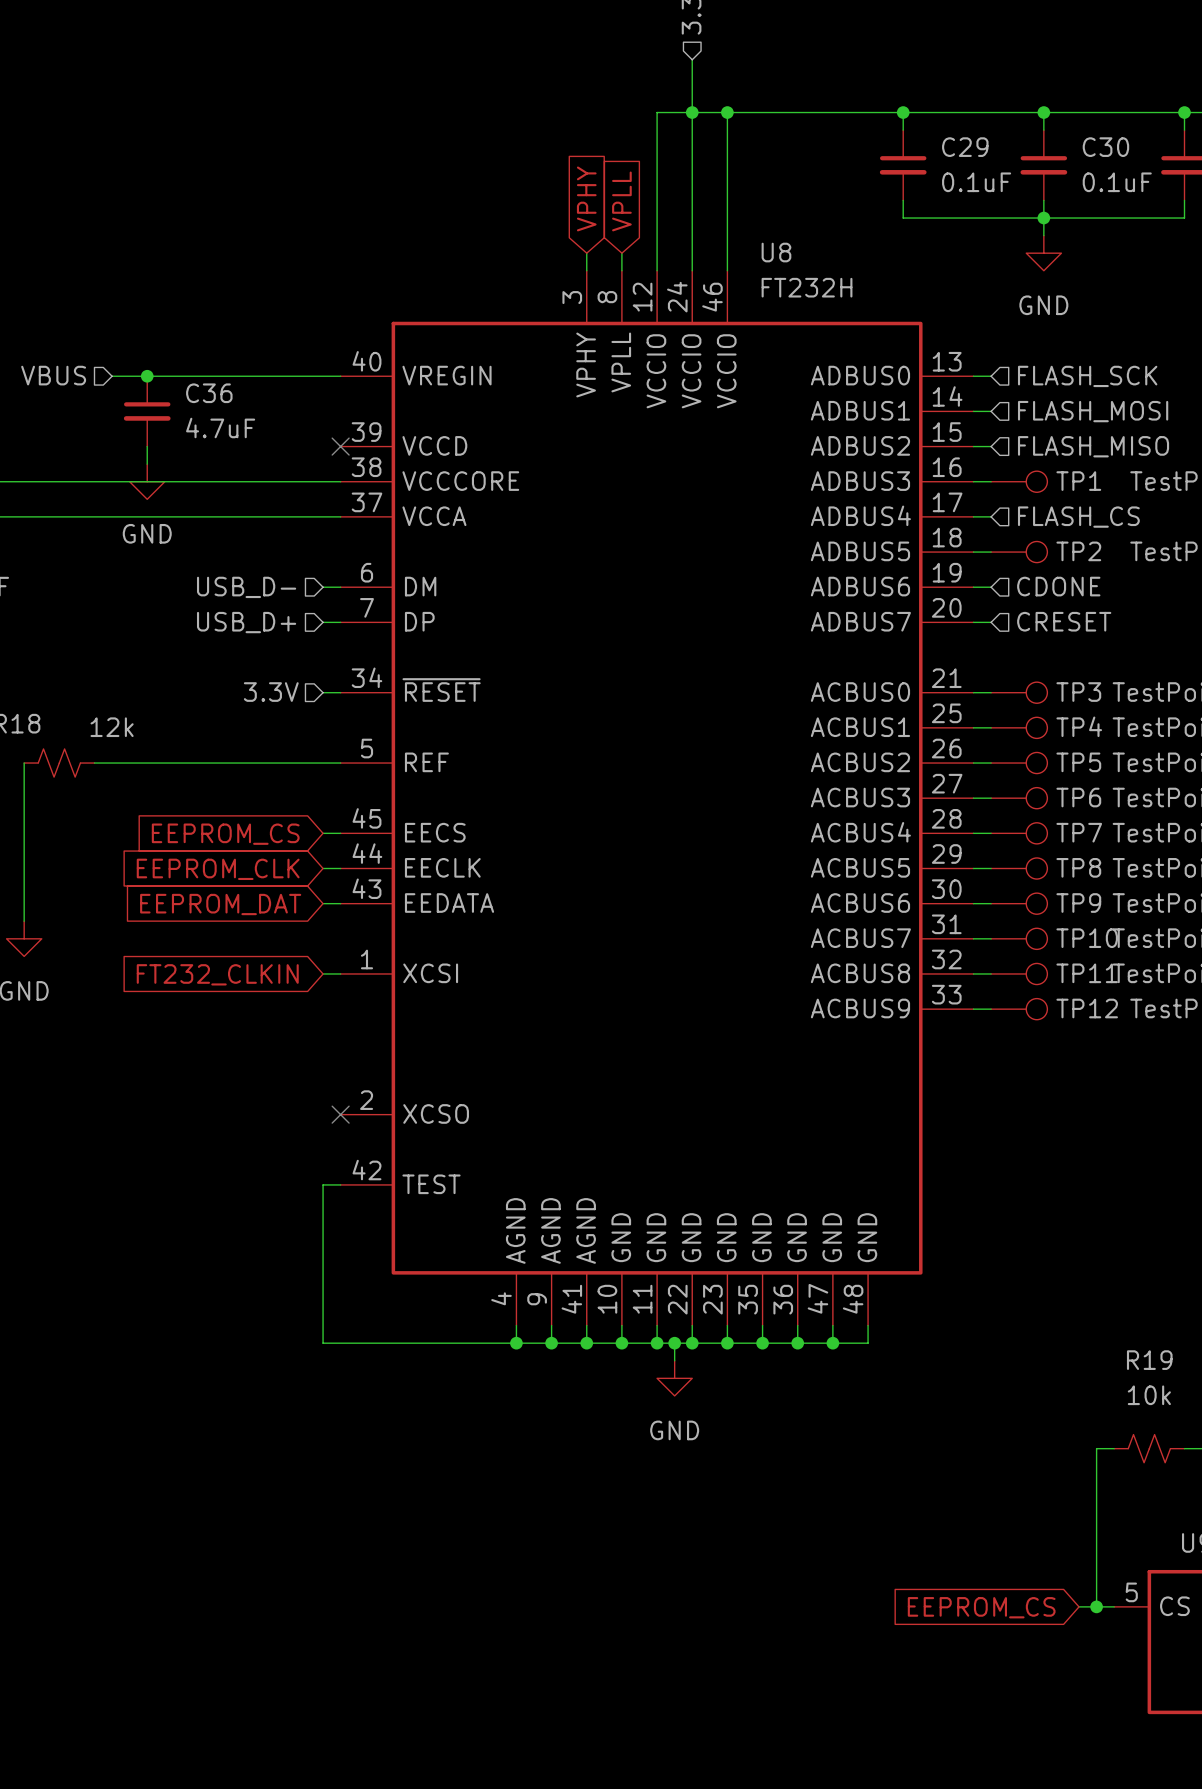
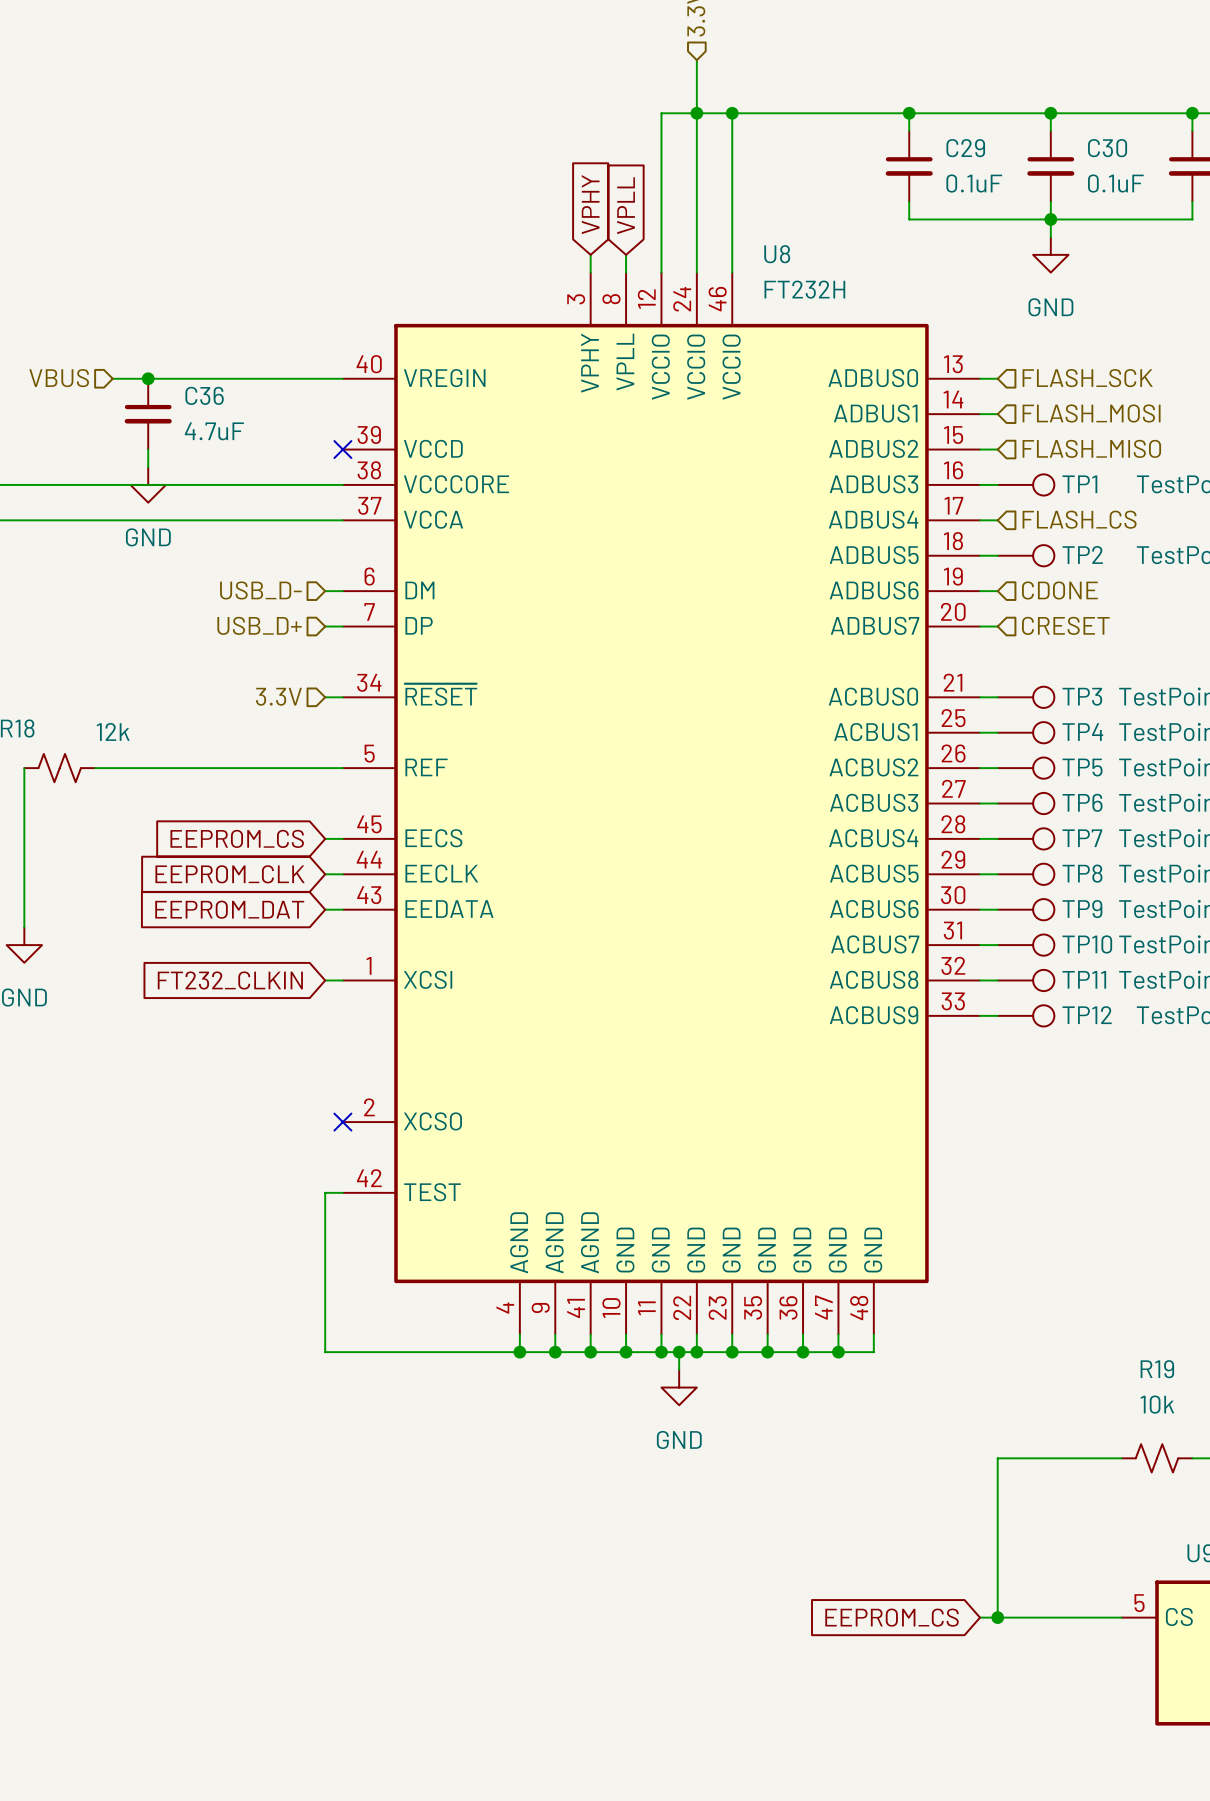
wire: (1096, 1448) (1096, 1606) -> (1103, 1458) (997, 1458) (997, 1617)
wire: none -> (980, 1617) (1086, 1617)
junction: none -> (997, 1617)
junction: (1096, 1606) -> none
global label position: EEPROM_CS (981, 1607) -> EEPROM_CS (892, 1617)

